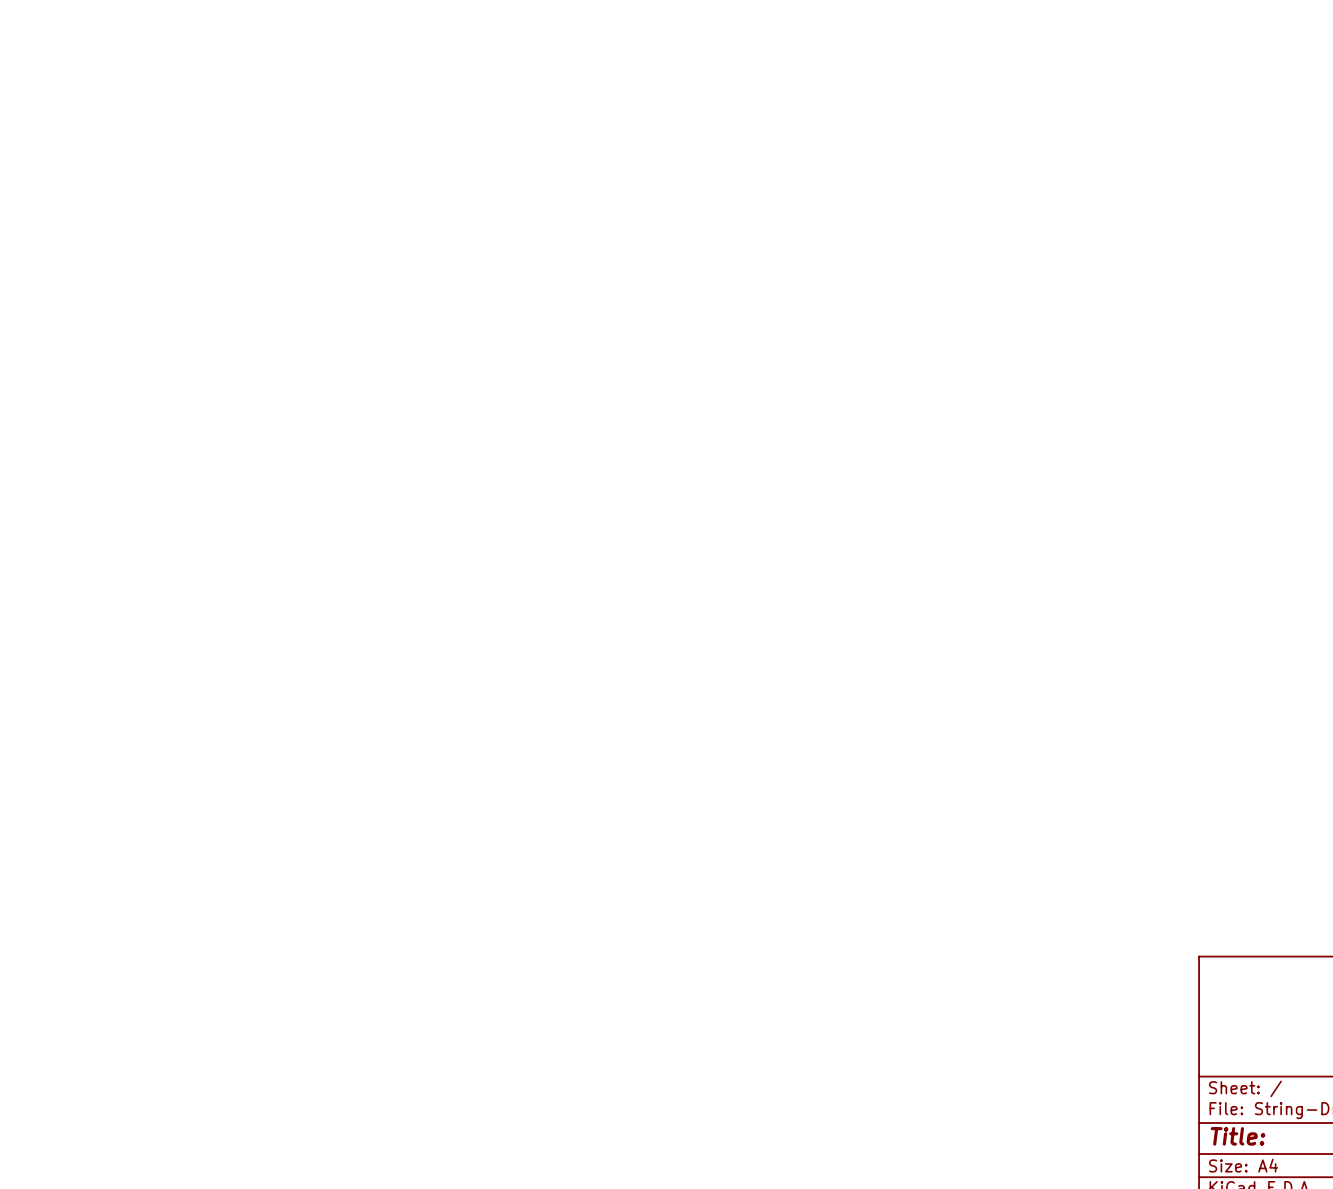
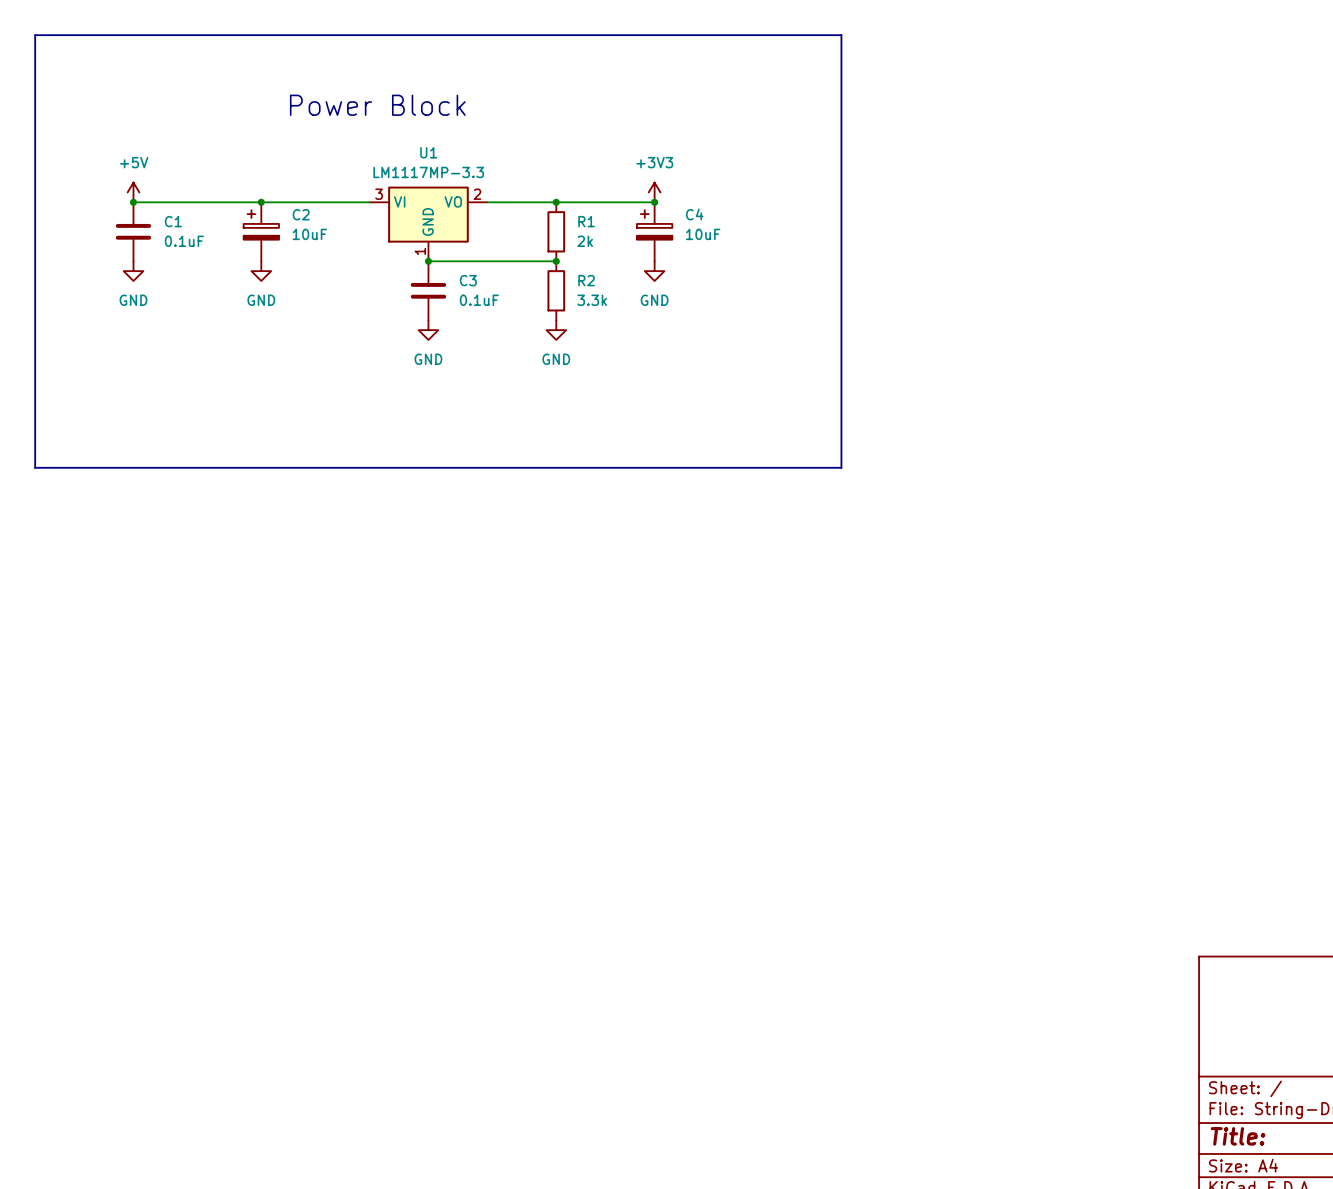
line: none -> (35, 35) (841, 35) (841, 467) (35, 467) (35, 35)
text: none -> Power Block (377, 105)
power symbol: none -> +5V (133, 192)
power symbol: none -> +3V3 (654, 192)
wire: none -> (133, 202) (369, 202)
junction: none -> (133, 202)
junction: none -> (261, 202)
wire: none -> (487, 202) (654, 202)
junction: none -> (556, 202)
junction: none -> (654, 202)
U1: none -> LM1117MP-3.3 (428, 223)
C1: none -> 0.1uF (133, 231)
C2: none -> 10uF (261, 231)
R1: none -> 2k (556, 231)
C4: none -> 10uF (654, 231)
wire: none -> (428, 261) (556, 261)
junction: none -> (428, 261)
junction: none -> (556, 261)
power symbol: none -> GND (133, 271)
power symbol: none -> GND (261, 271)
power symbol: none -> GND (654, 271)
C3: none -> 0.1uF (428, 290)
R2: none -> 3.3k (556, 290)
power symbol: none -> GND (428, 330)
power symbol: none -> GND (556, 330)

